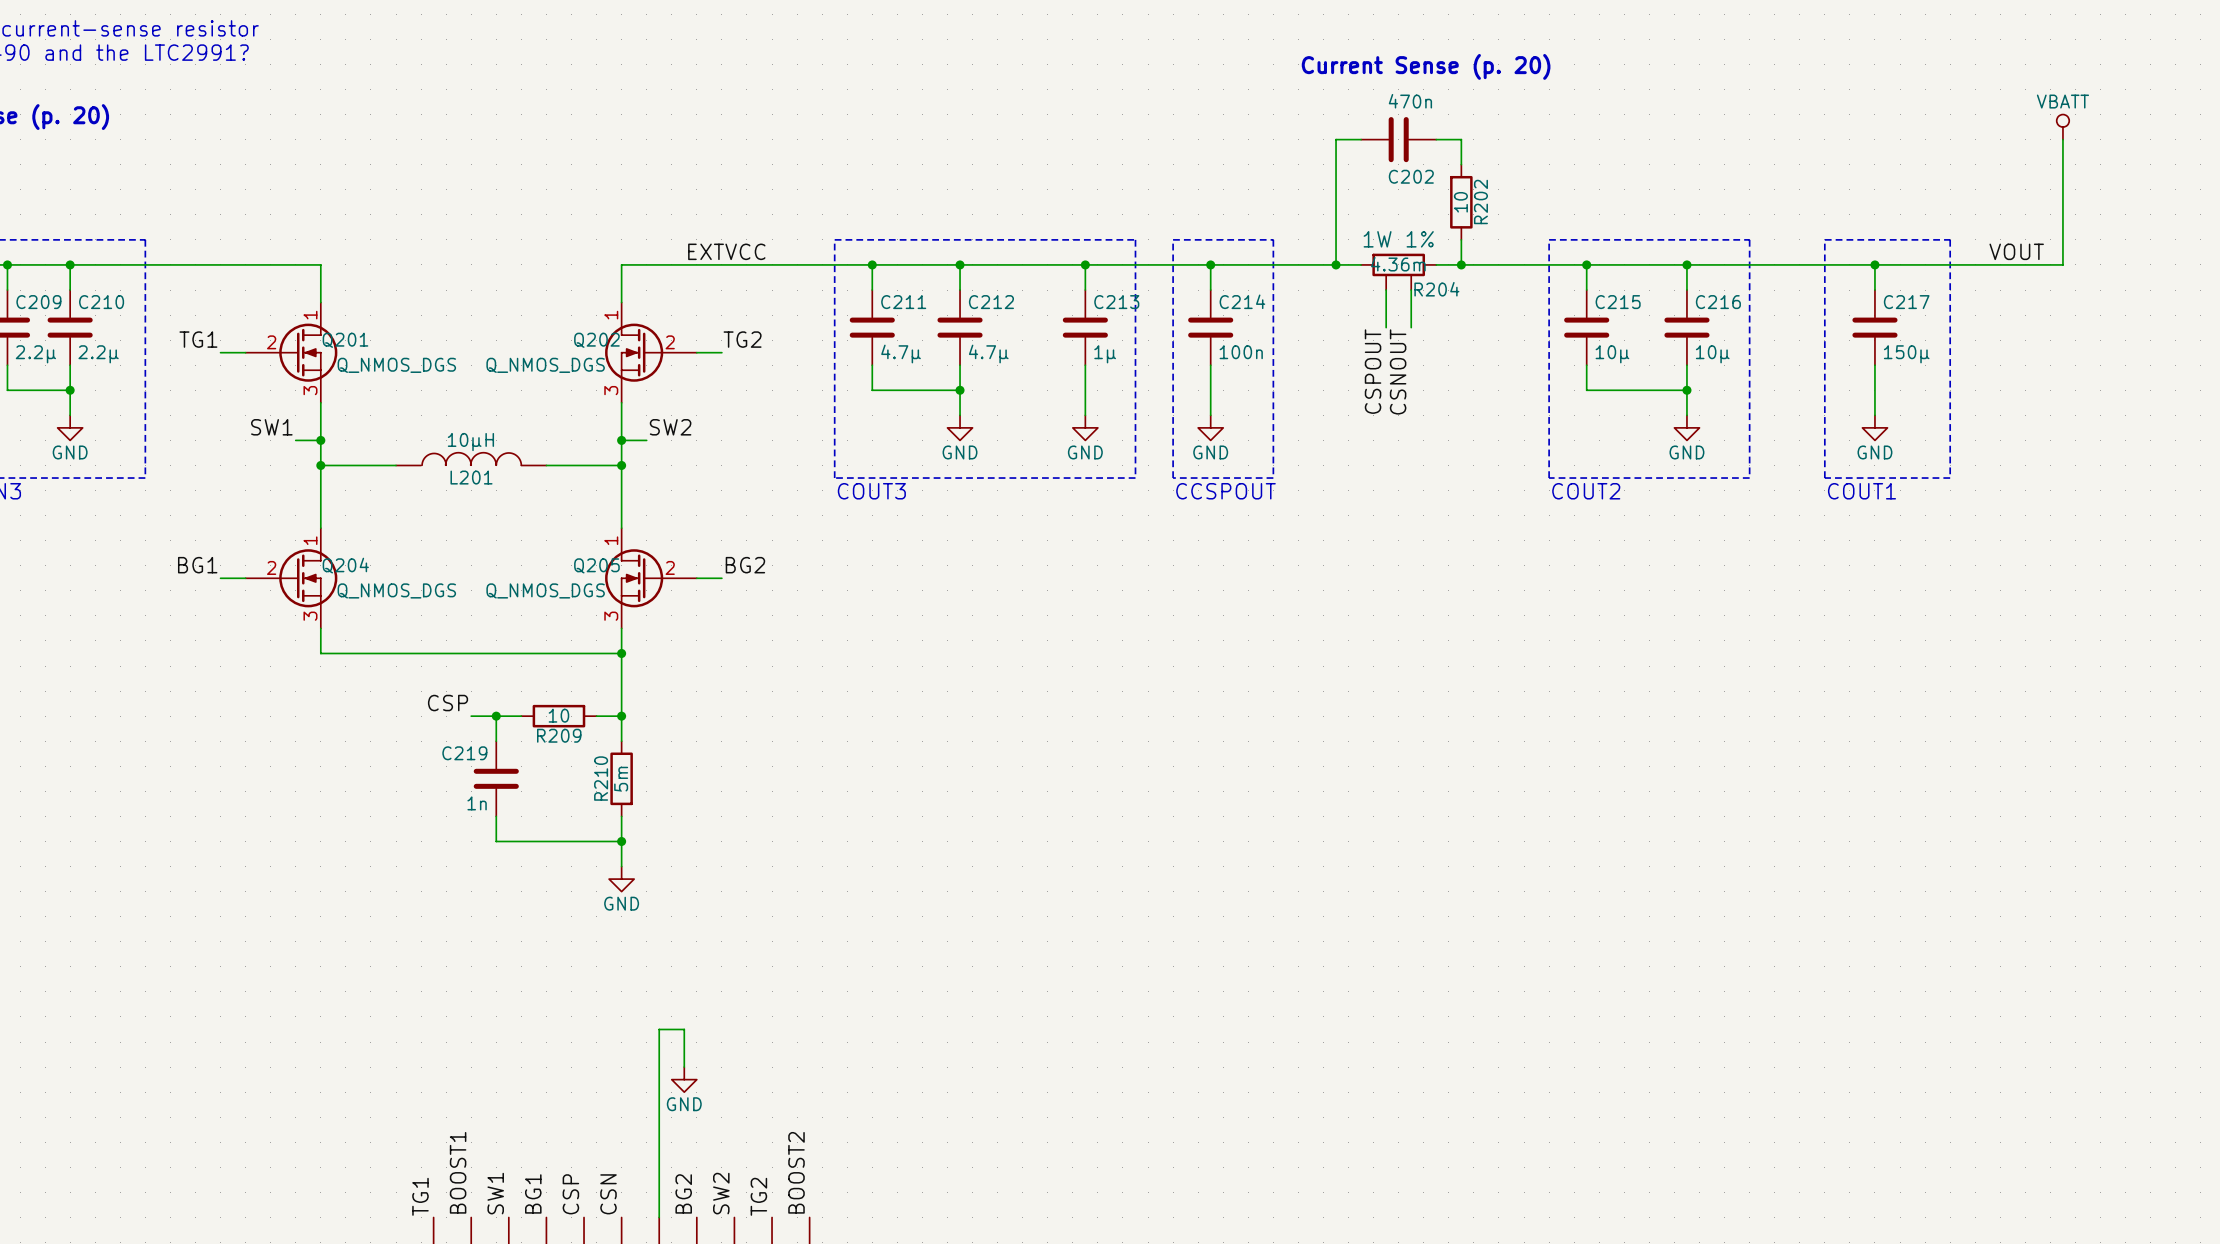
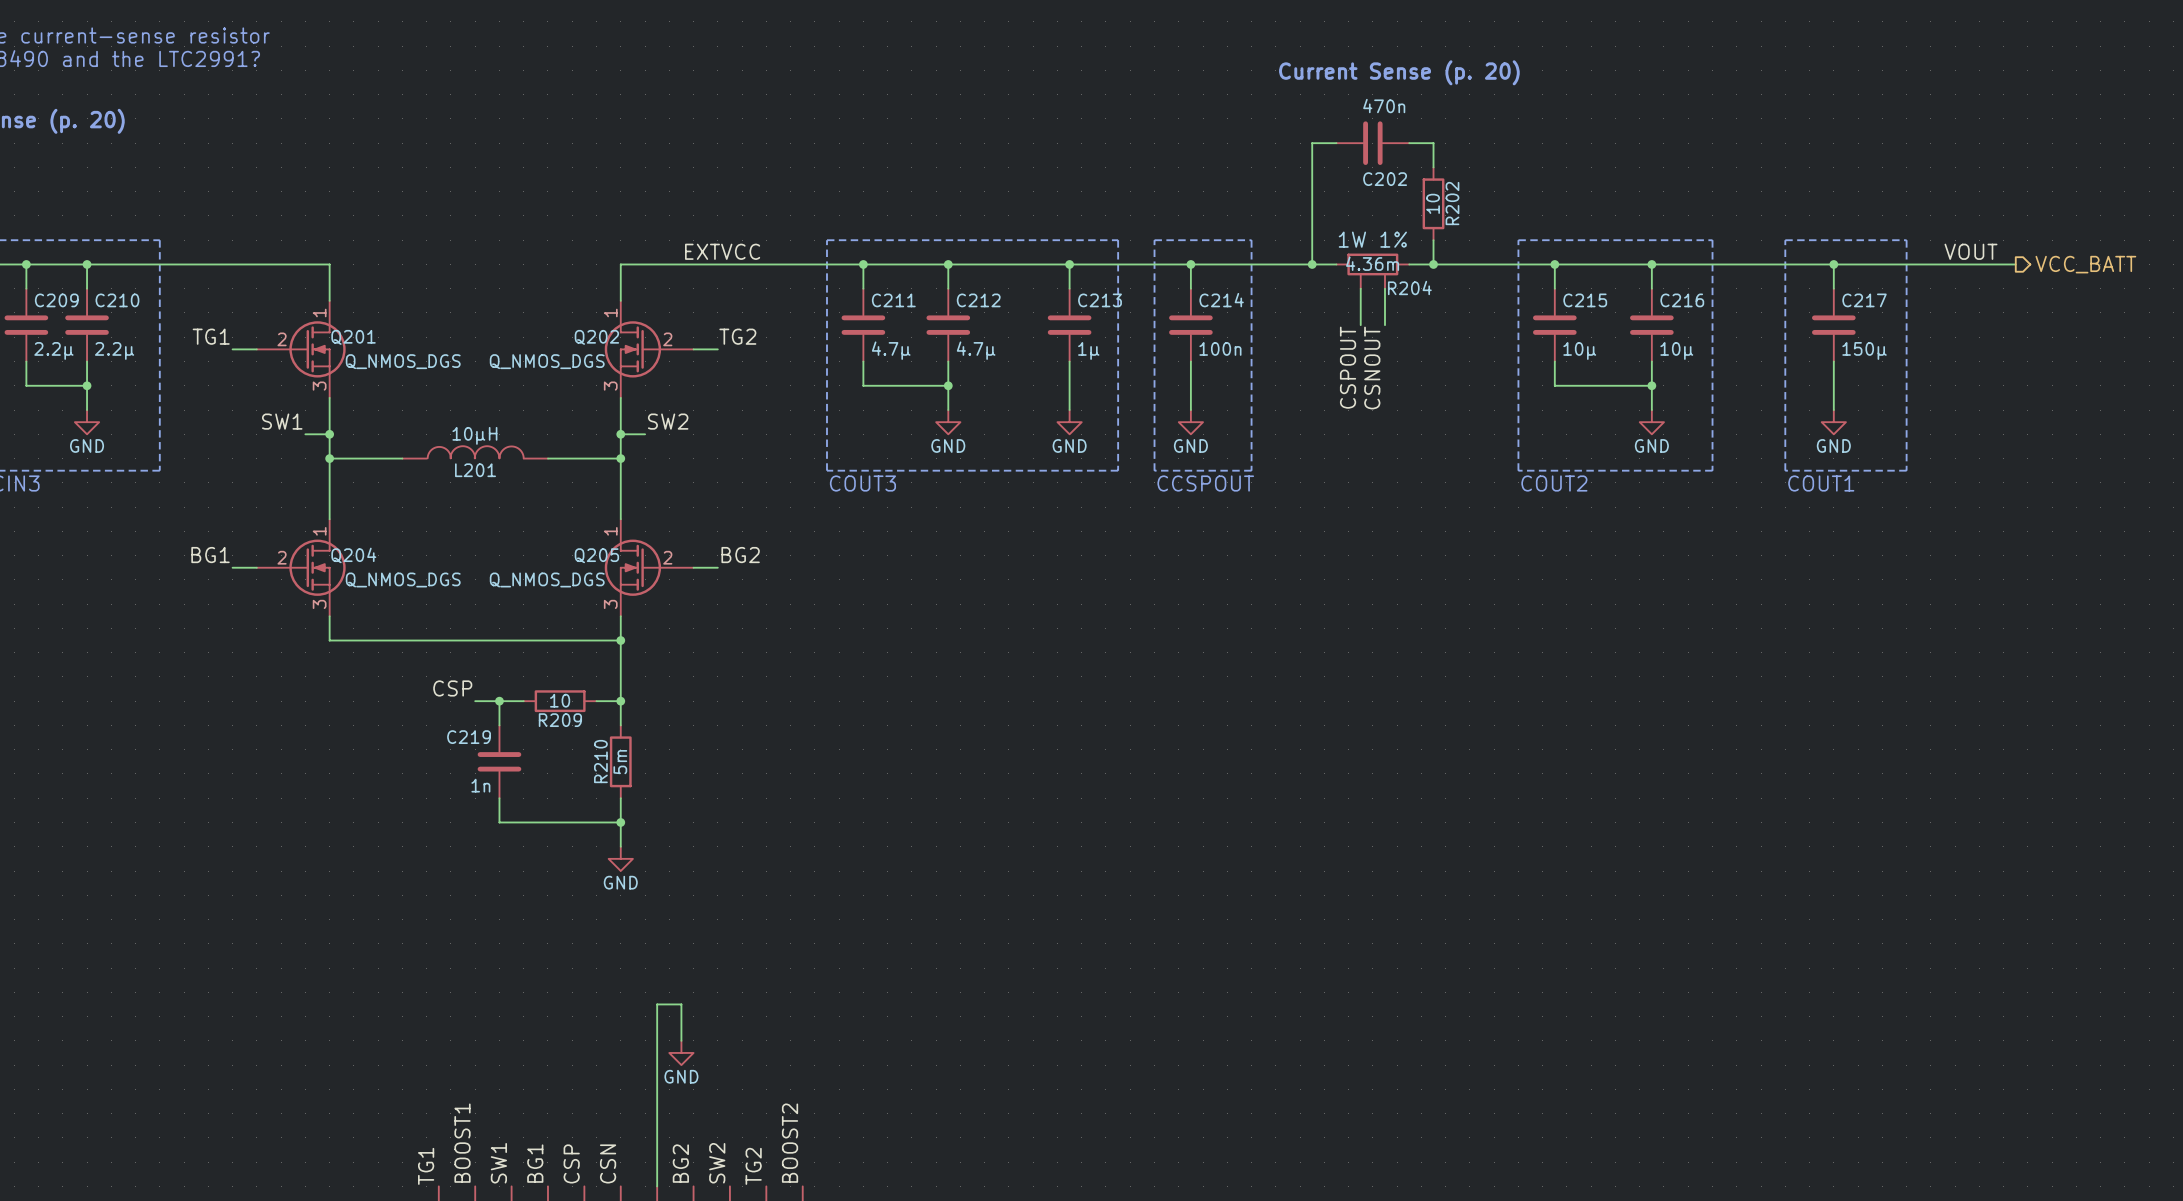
power symbol: VBATT (2062, 127) -> none
wire: (2062, 139) (2062, 264) -> none
hierarchical label: none -> VCC_BATT (2085, 264)

